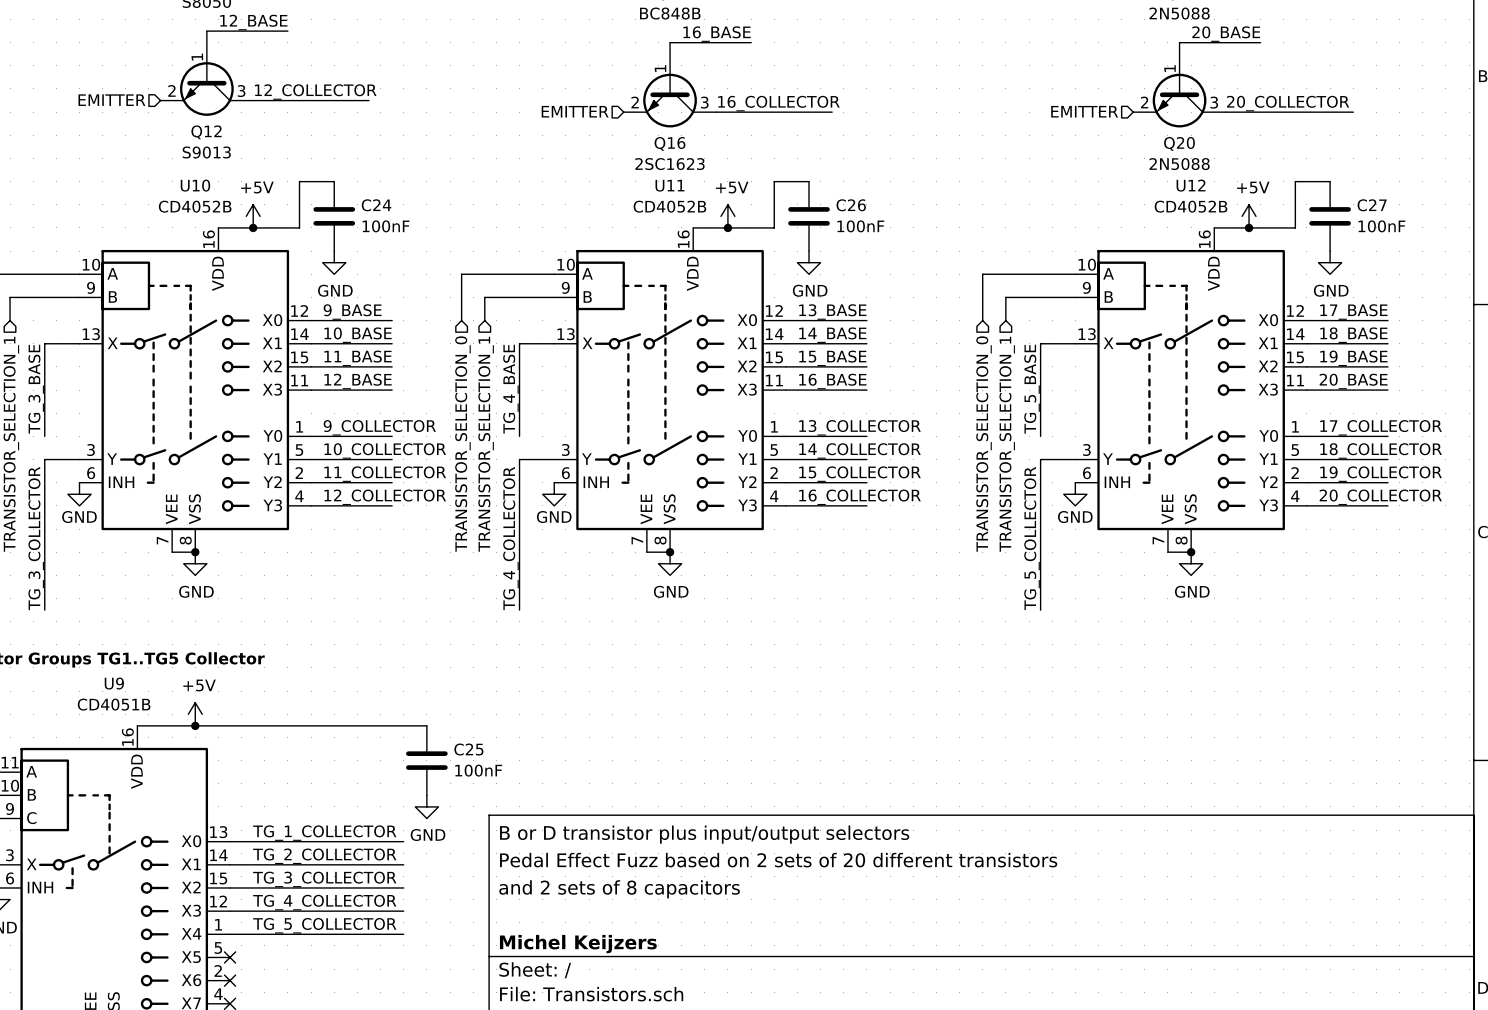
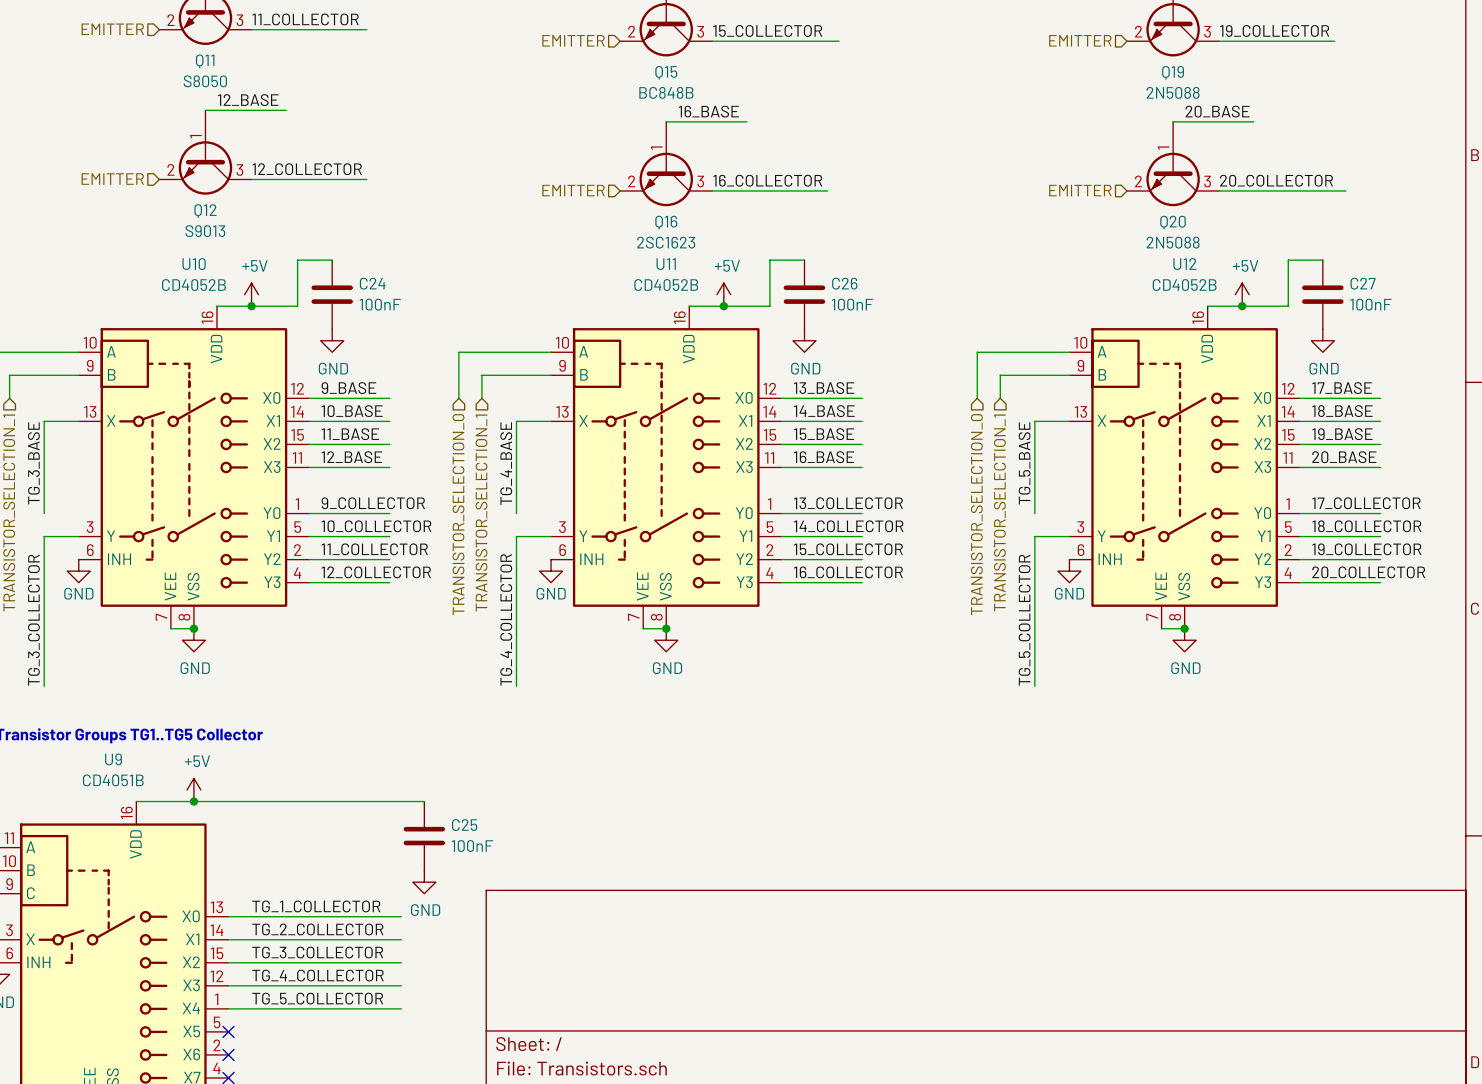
title block: B or D transistor plus input/output selectors (704, 834) -> none
title block: Pedal Effect Fuzz based on 2 sets of 20 different transistors (778, 860) -> none
title block: and 2 sets of 8 capacitors (619, 889) -> none
title block: Michel Keijzers (578, 944) -> none

